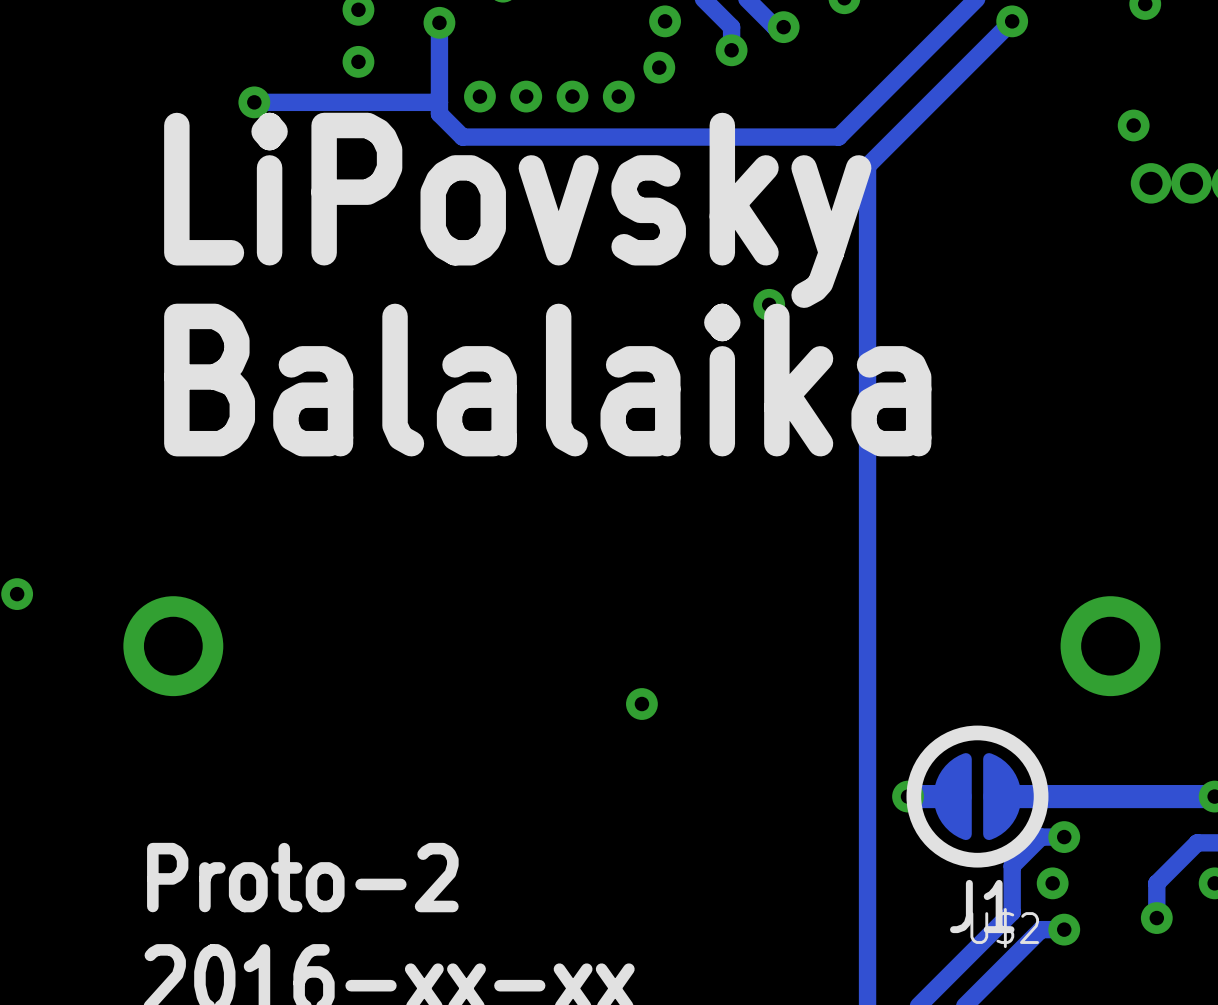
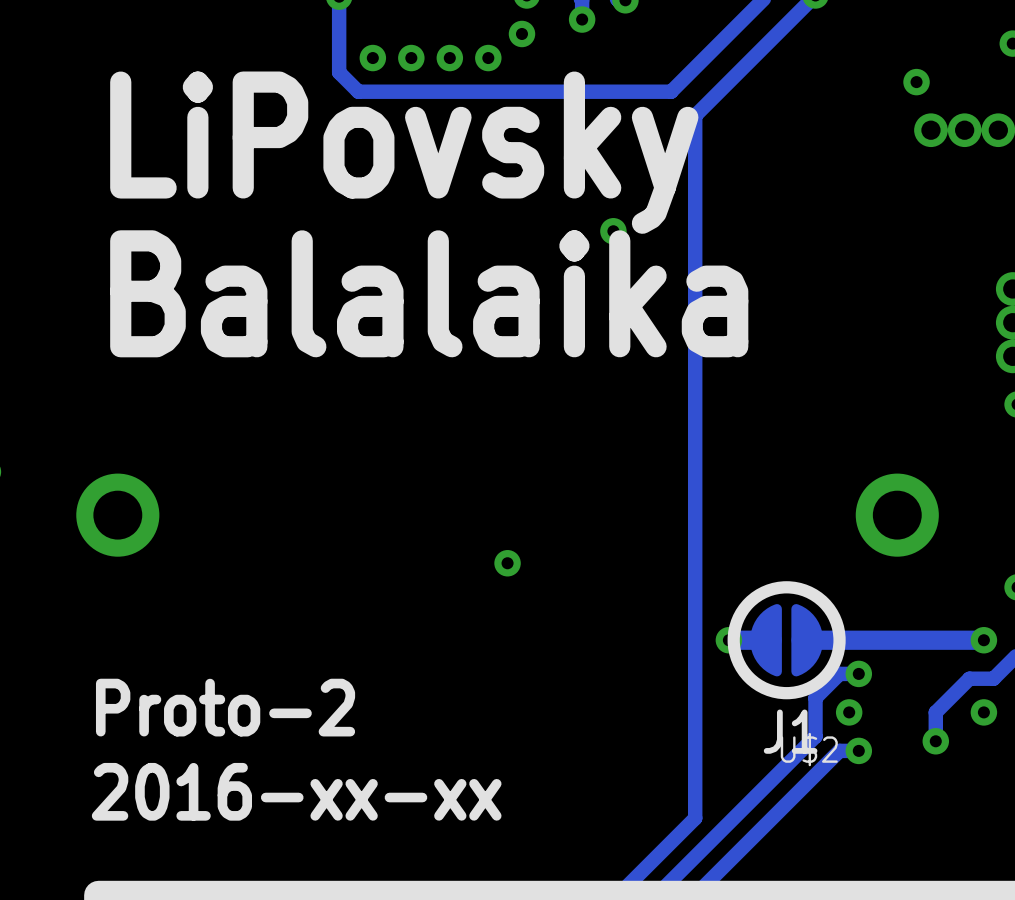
via: (358, 61) -> none
via: (254, 102) -> none
track: (439, 102) (254, 102) -> none

